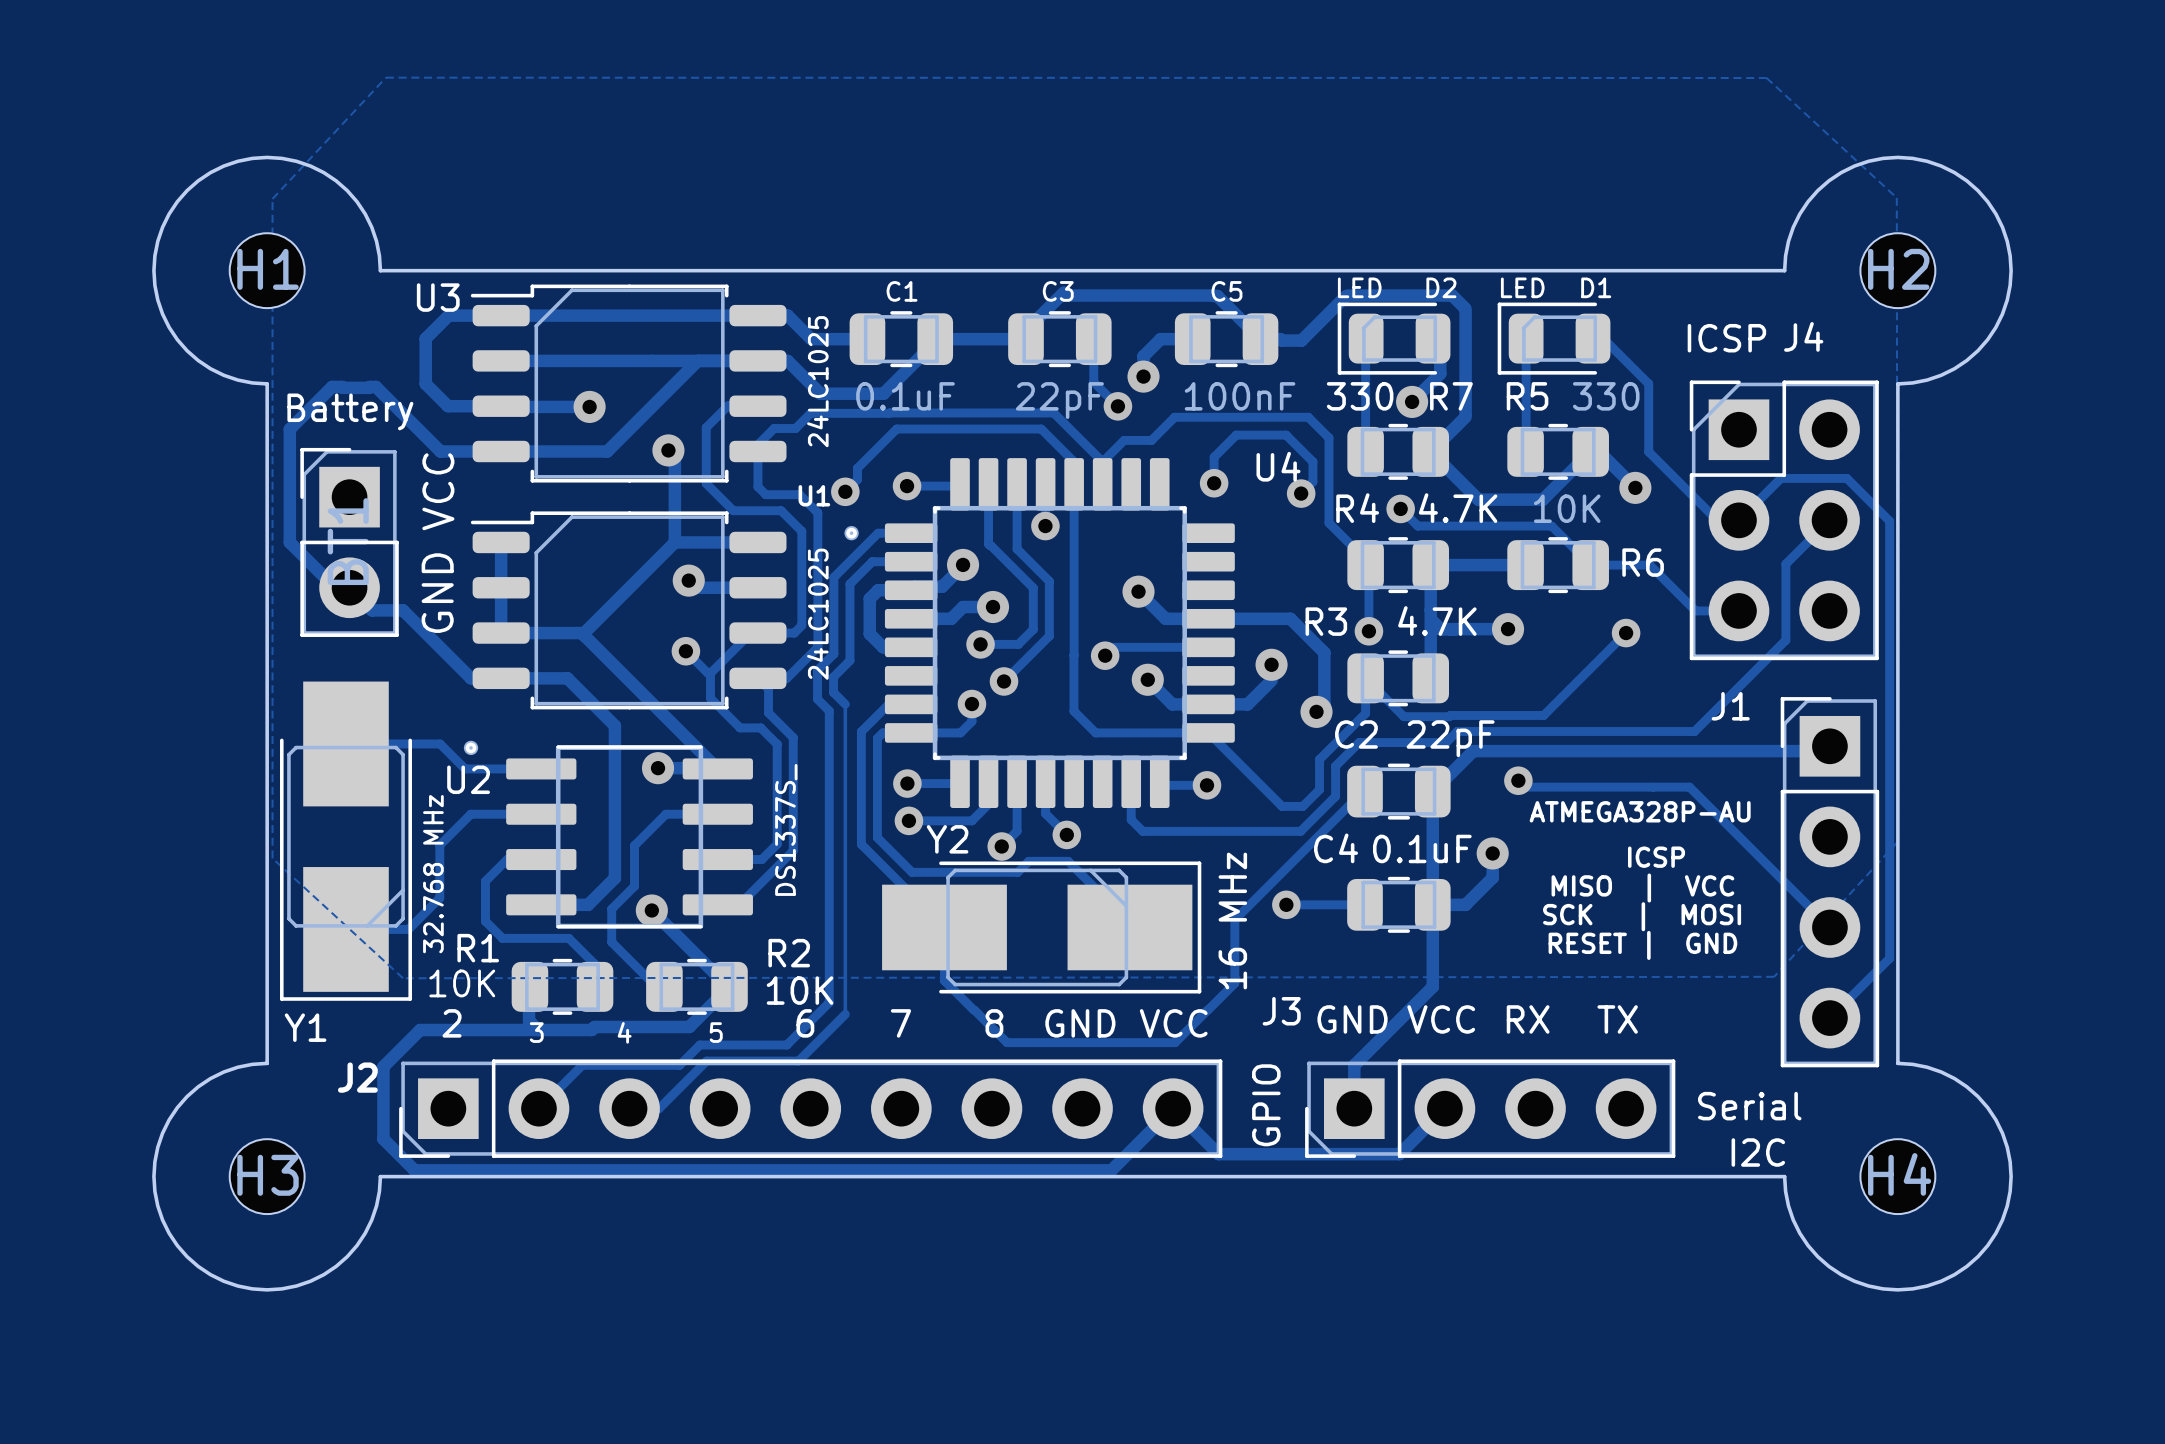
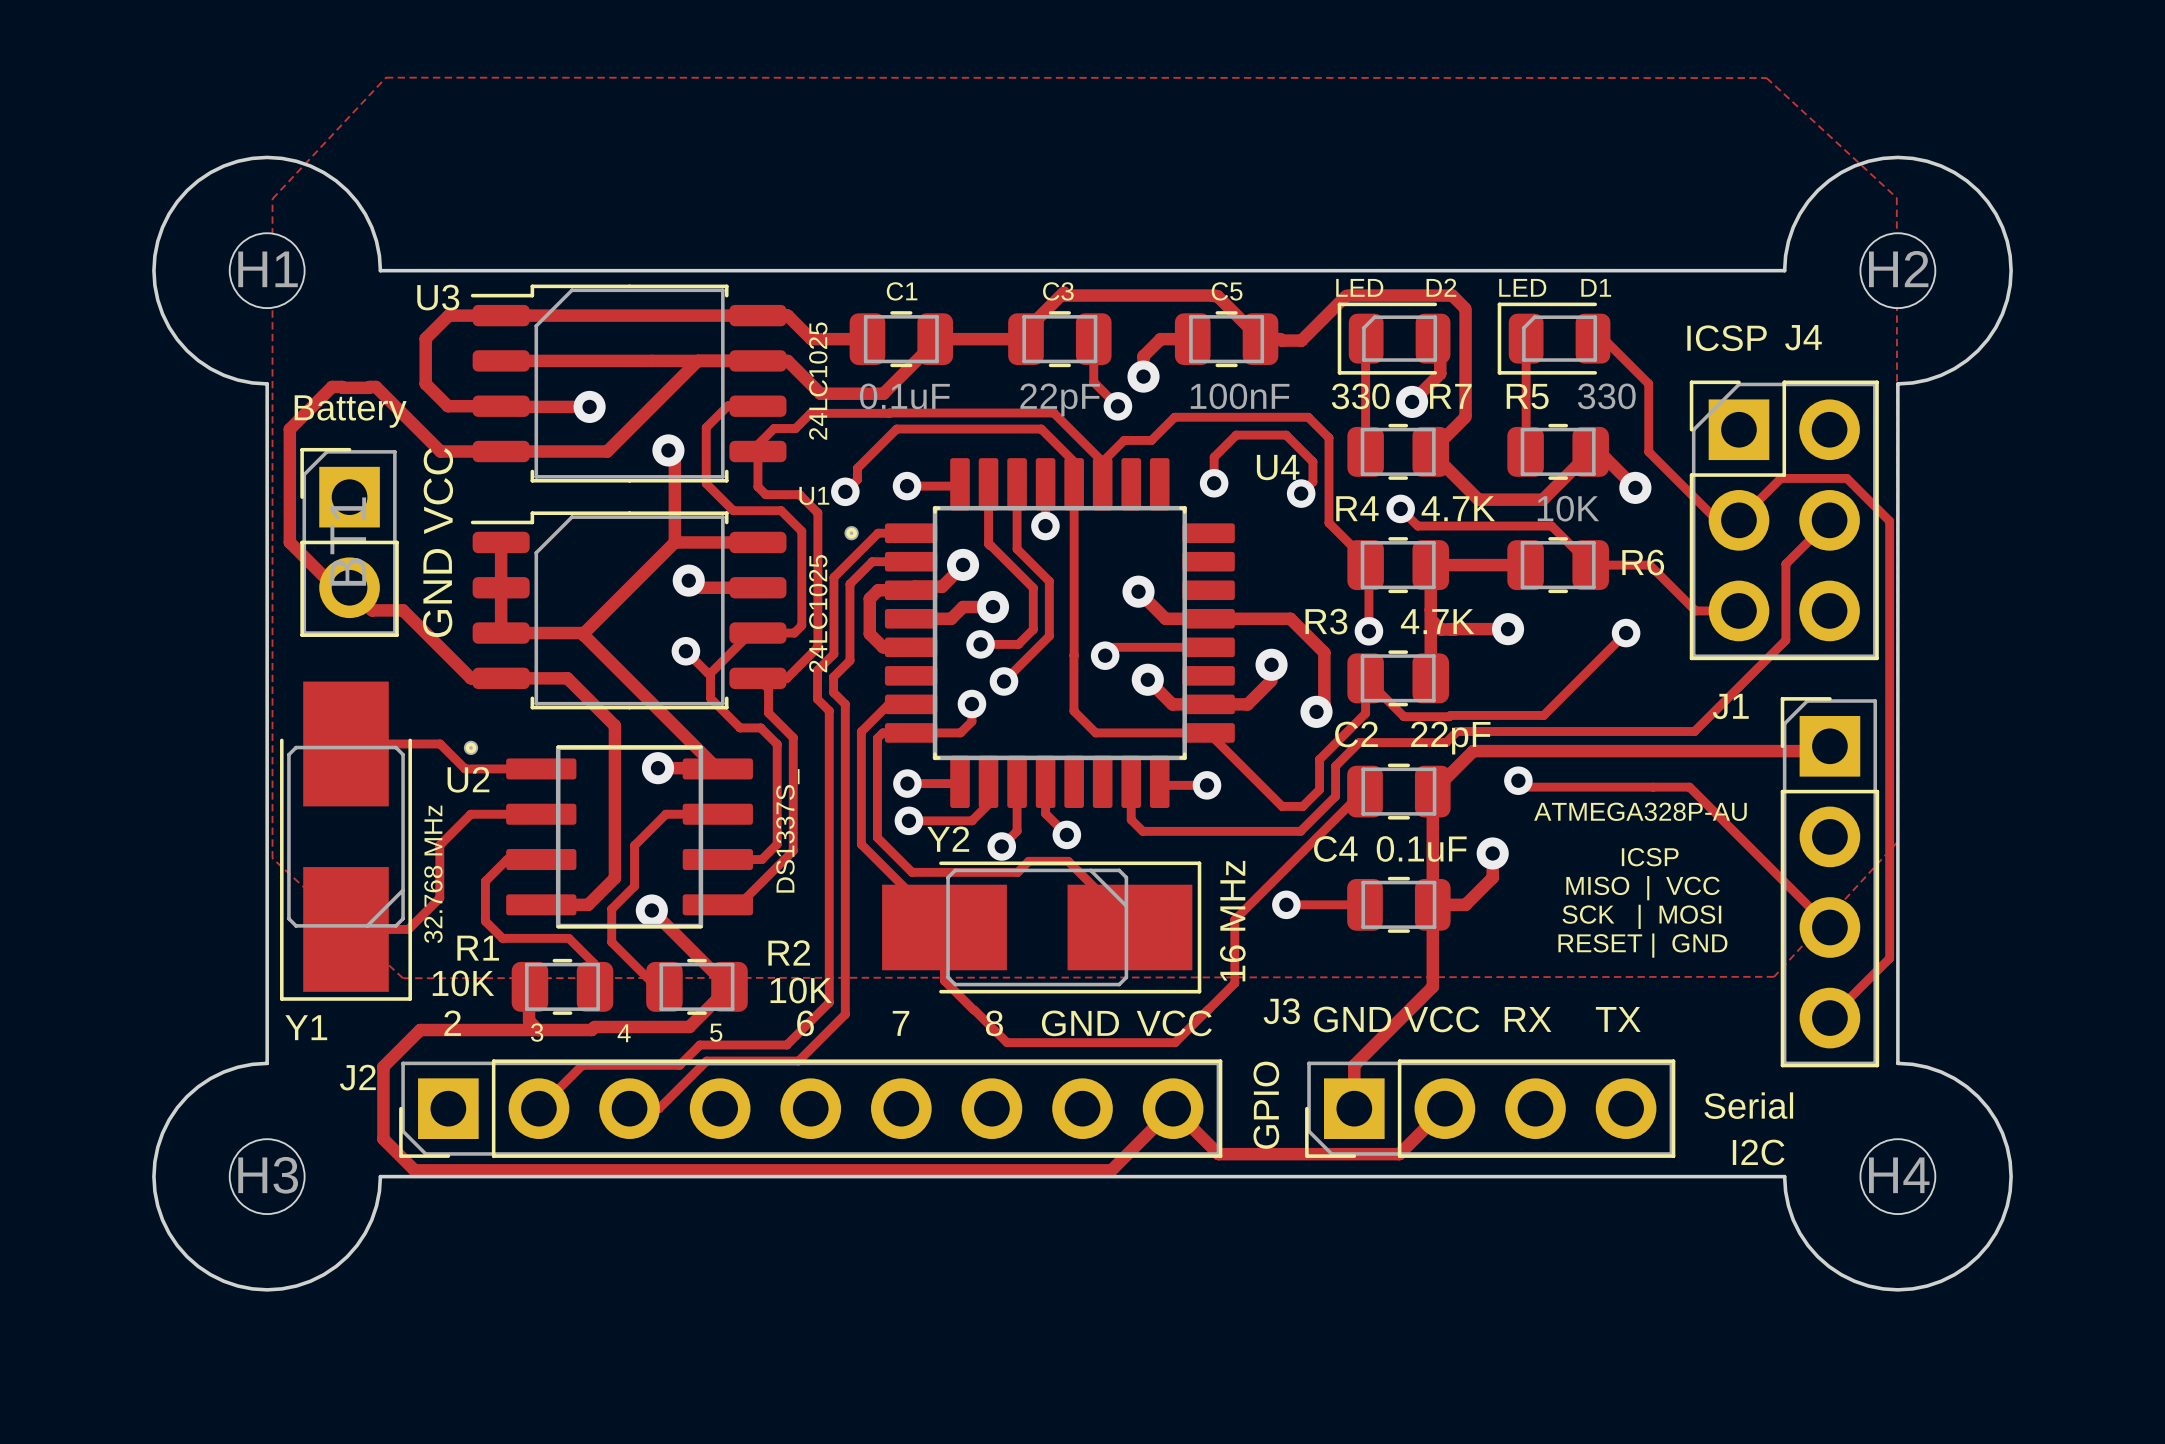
track width: thin (845, 704) (845, 1014) -> thick (845, 704) (845, 1014)

